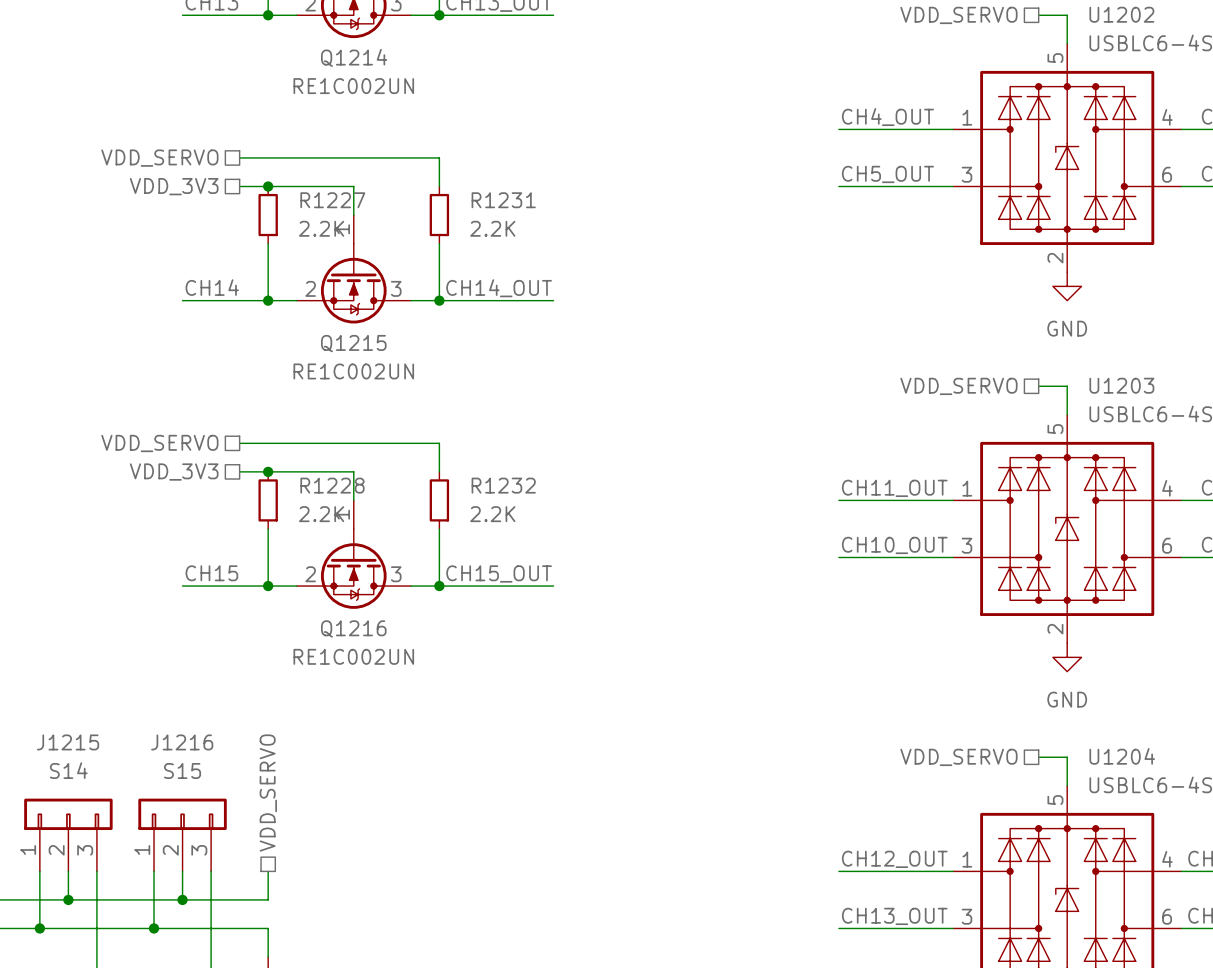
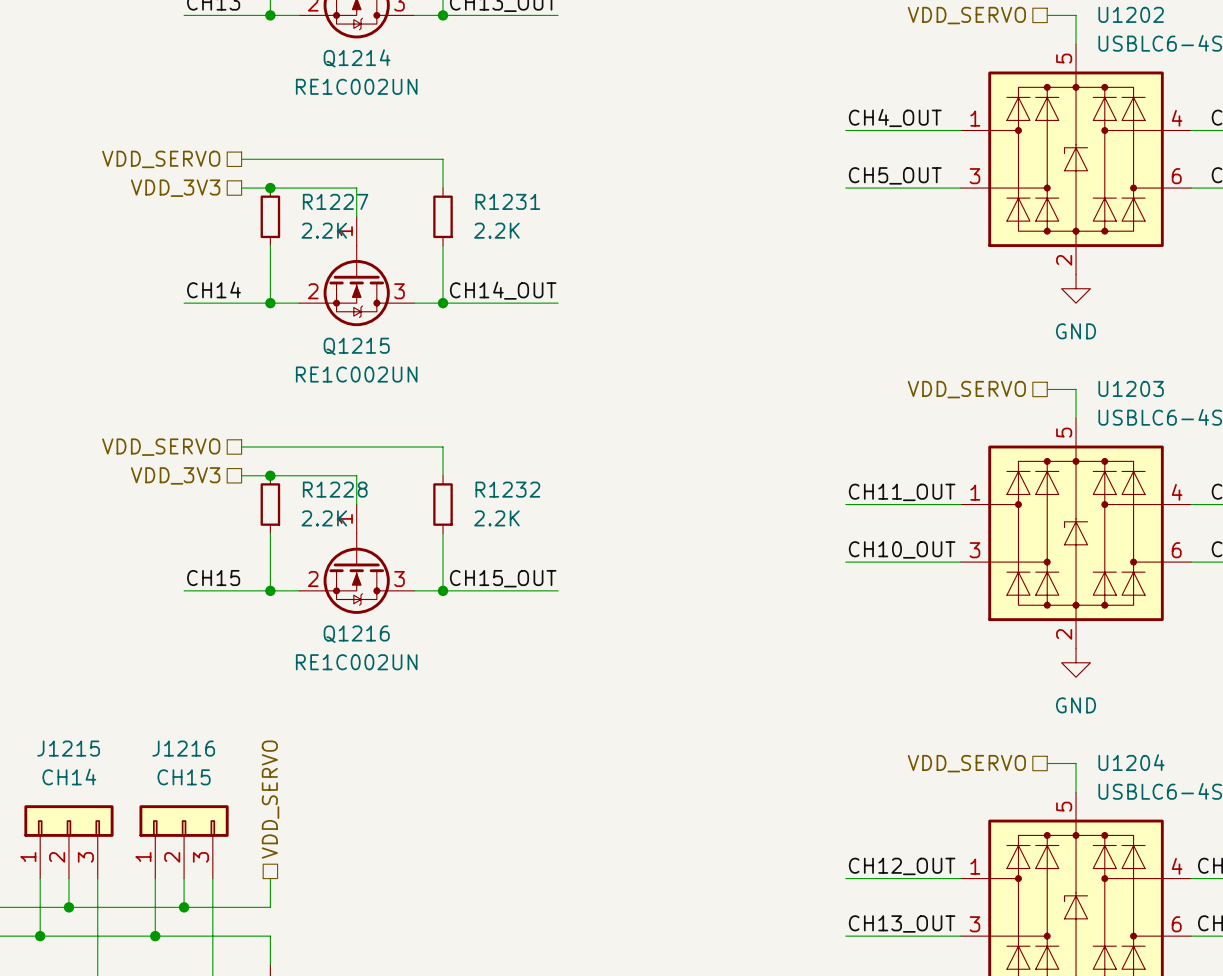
J1215 value: S14 (68, 770) -> CH14 (69, 777)
J1216 value: S15 (182, 770) -> CH15 (184, 777)

